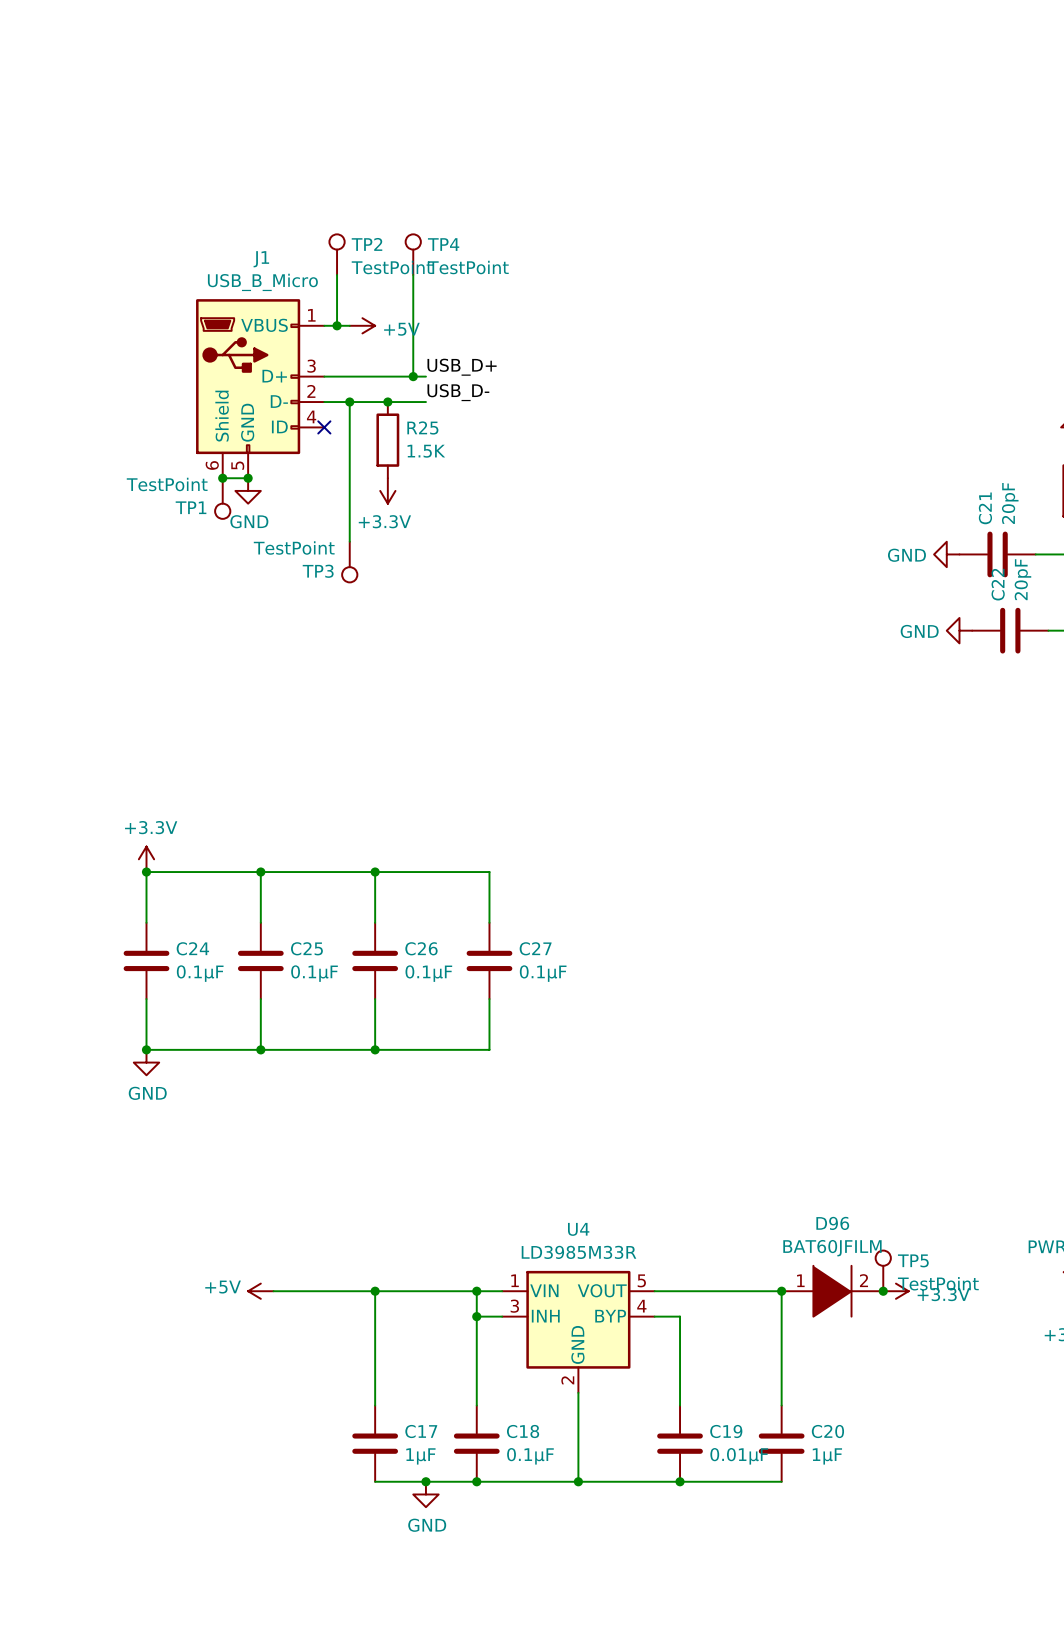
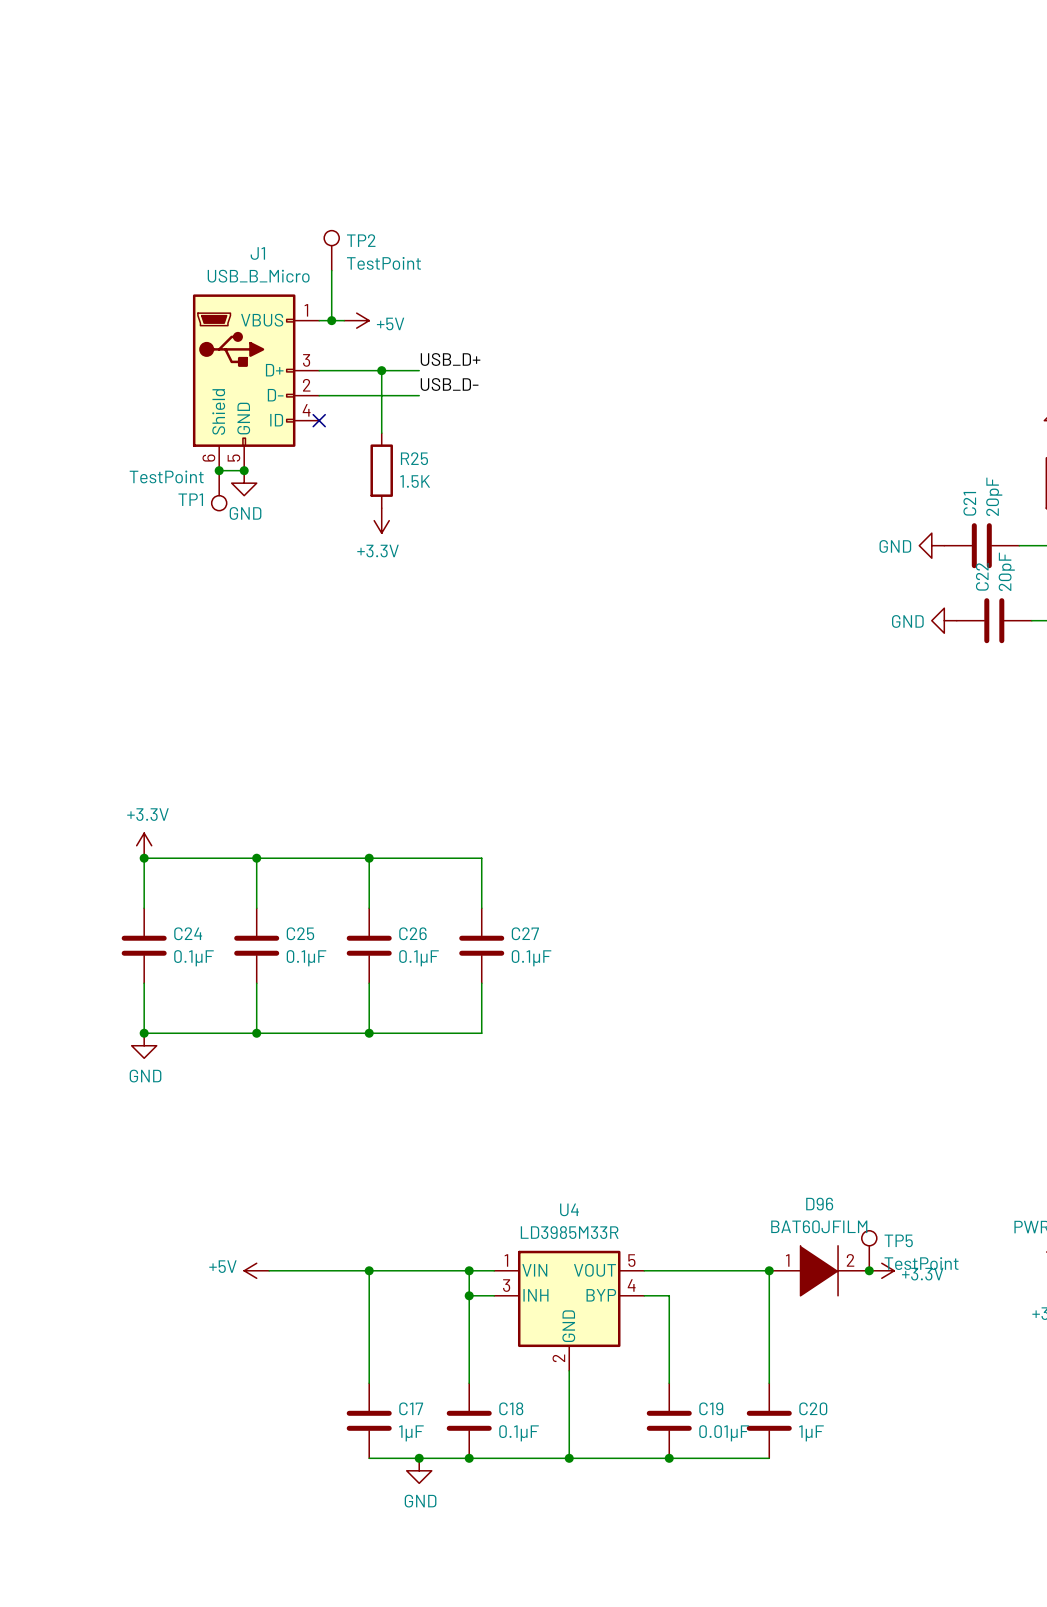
TP4: TestPoint (413, 254) -> none
wire: (413, 274) (413, 376) -> none
wire: none -> (381, 370) (381, 433)
junction: none -> (381, 370)
junction: (413, 376) -> none
wire: (349, 402) (349, 541) -> none
junction: (349, 402) -> none
junction: (387, 402) -> none
R25 position: (387, 440) -> (381, 470)
power symbol position: +3.3V (387, 490) -> +3.3V (381, 520)
TP3: TestPoint (349, 562) -> none

